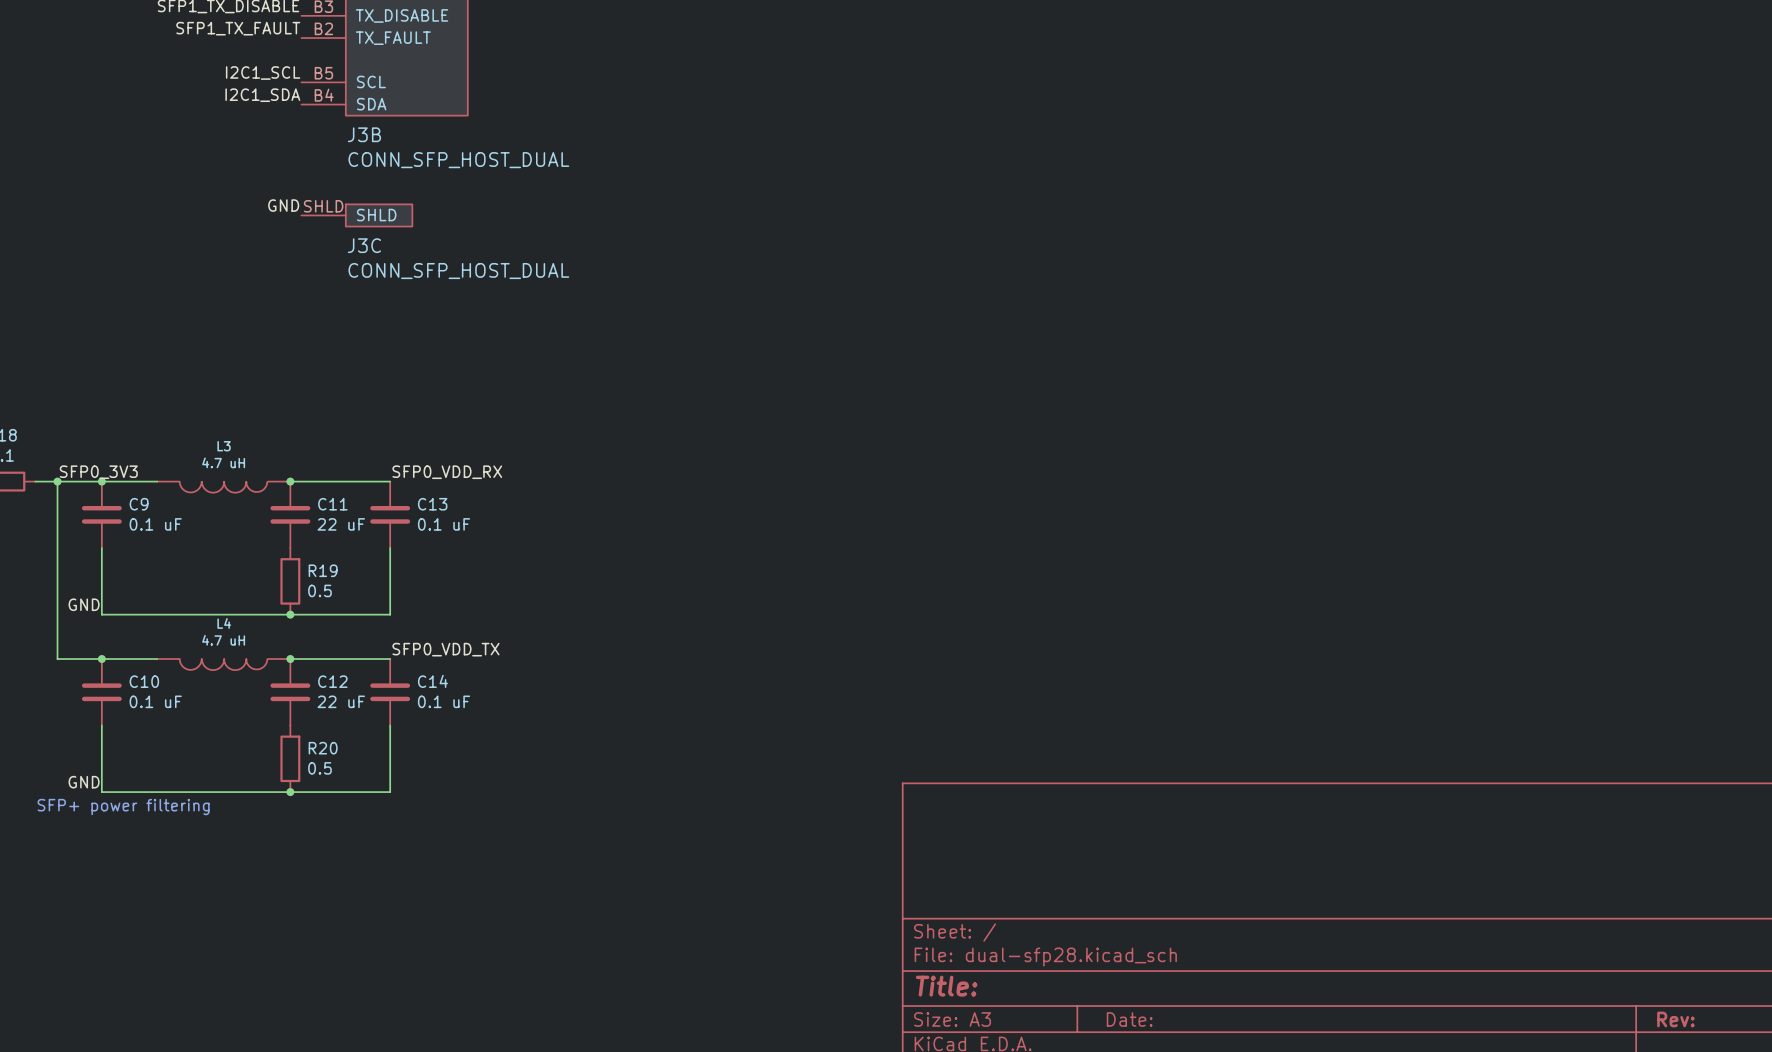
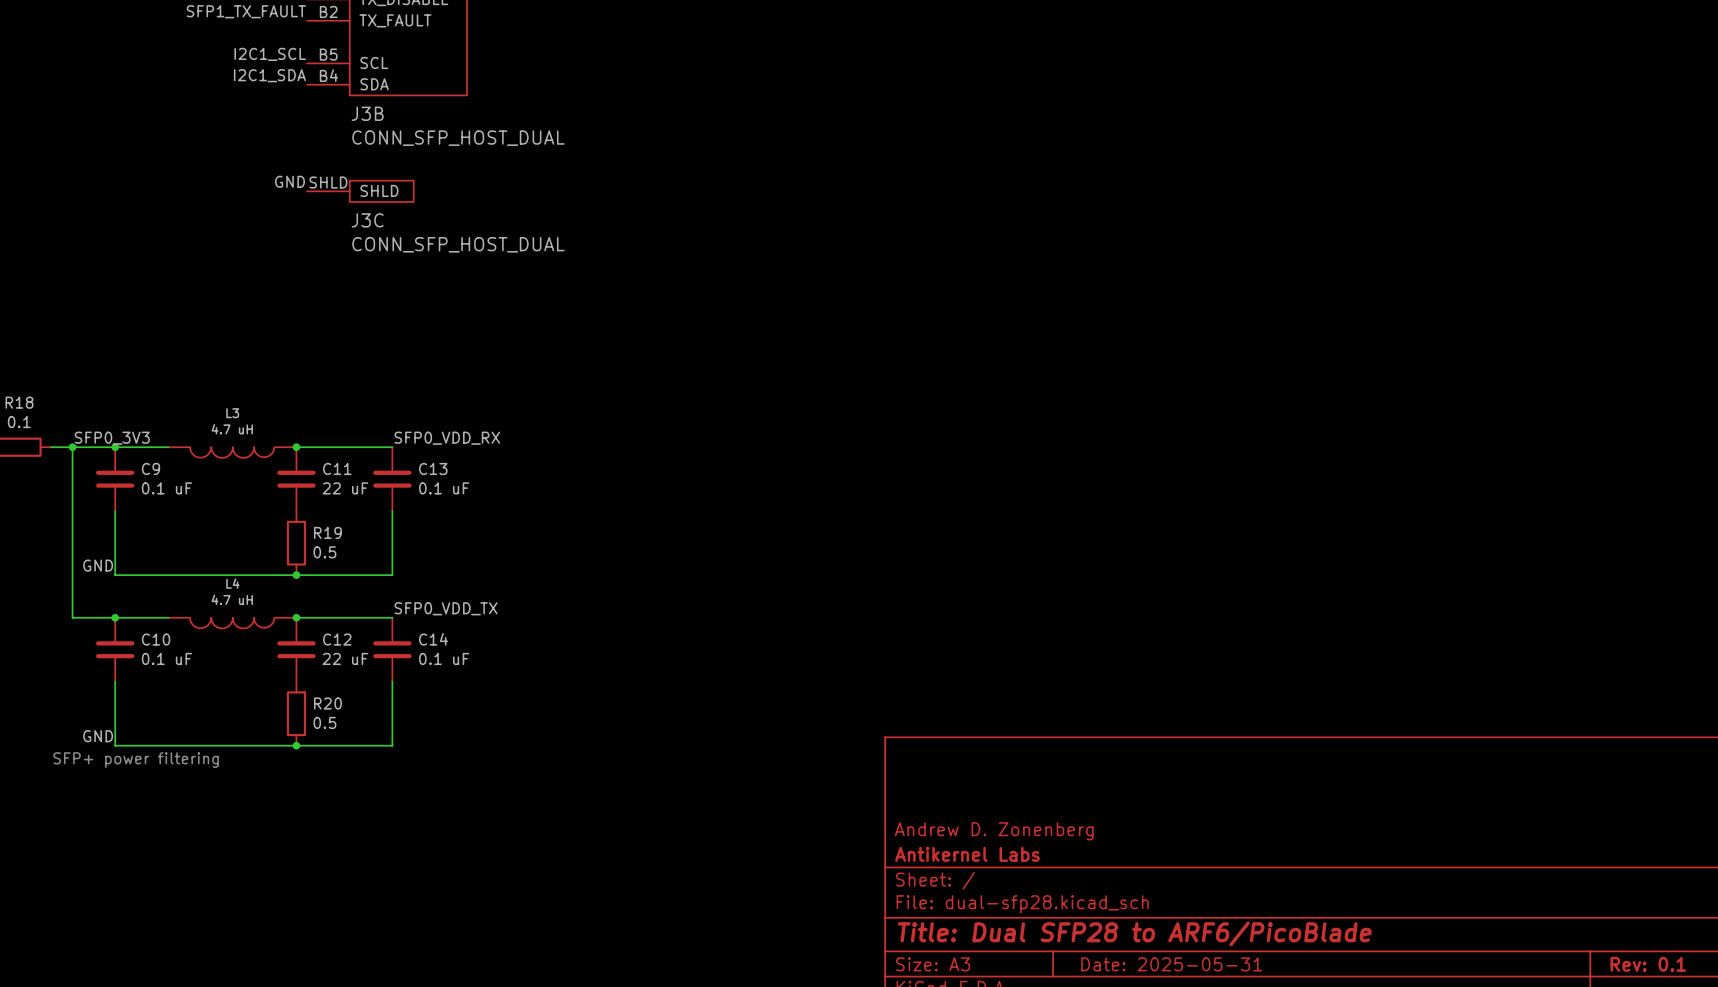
title block: none -> Andrew D. Zonenberg (994, 831)
title block: none -> Antikernel Labs (967, 854)
title block: Title: (946, 986) -> Title: Dual SFP28 to ARF6/PicoBlade (1134, 933)
title block: Date: (1129, 1019) -> Date: 2025-05-31 (1171, 964)
title block: Rev: (1675, 1019) -> Rev: 0.1 (1648, 964)

